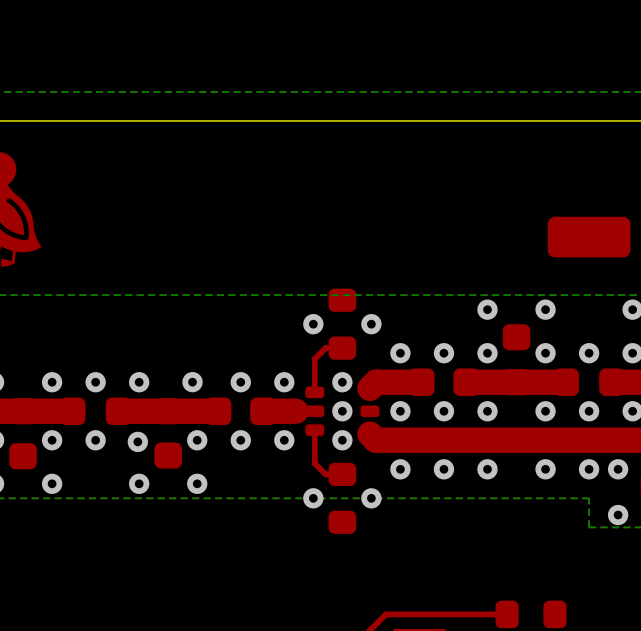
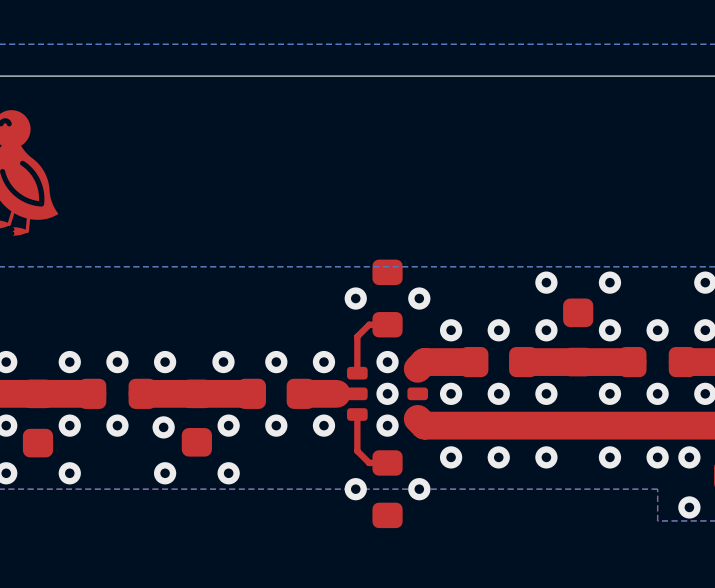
part: (589, 237) -> none

